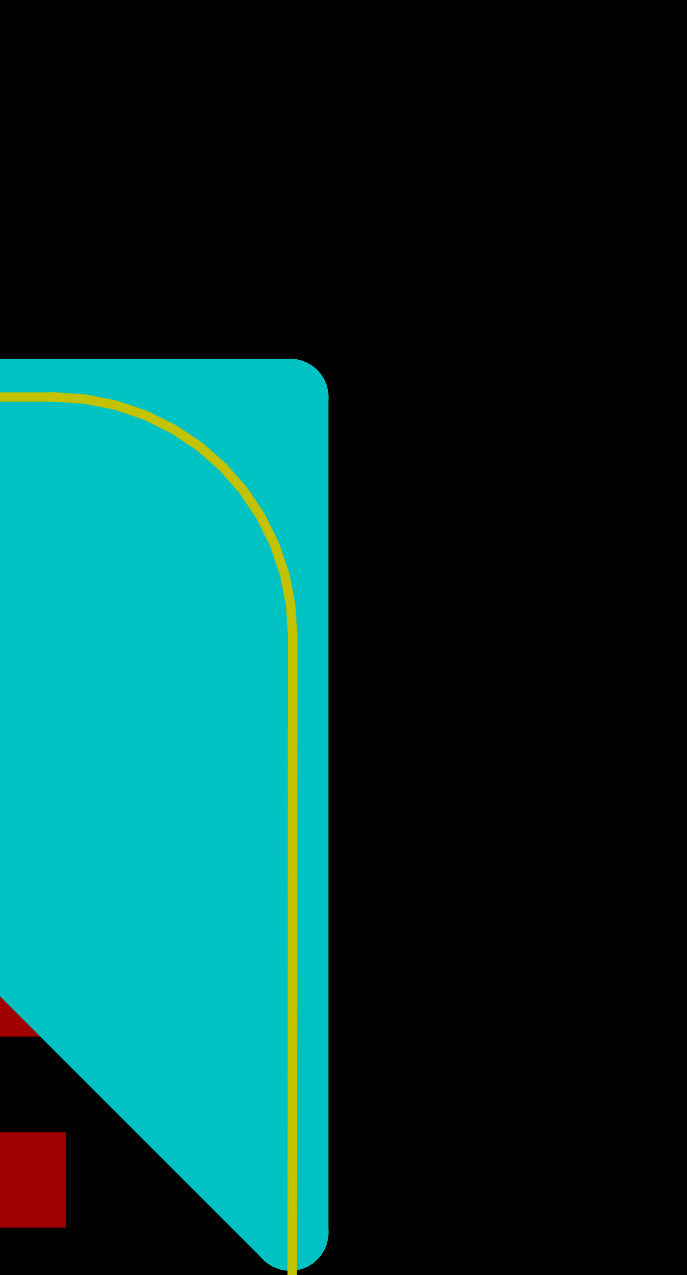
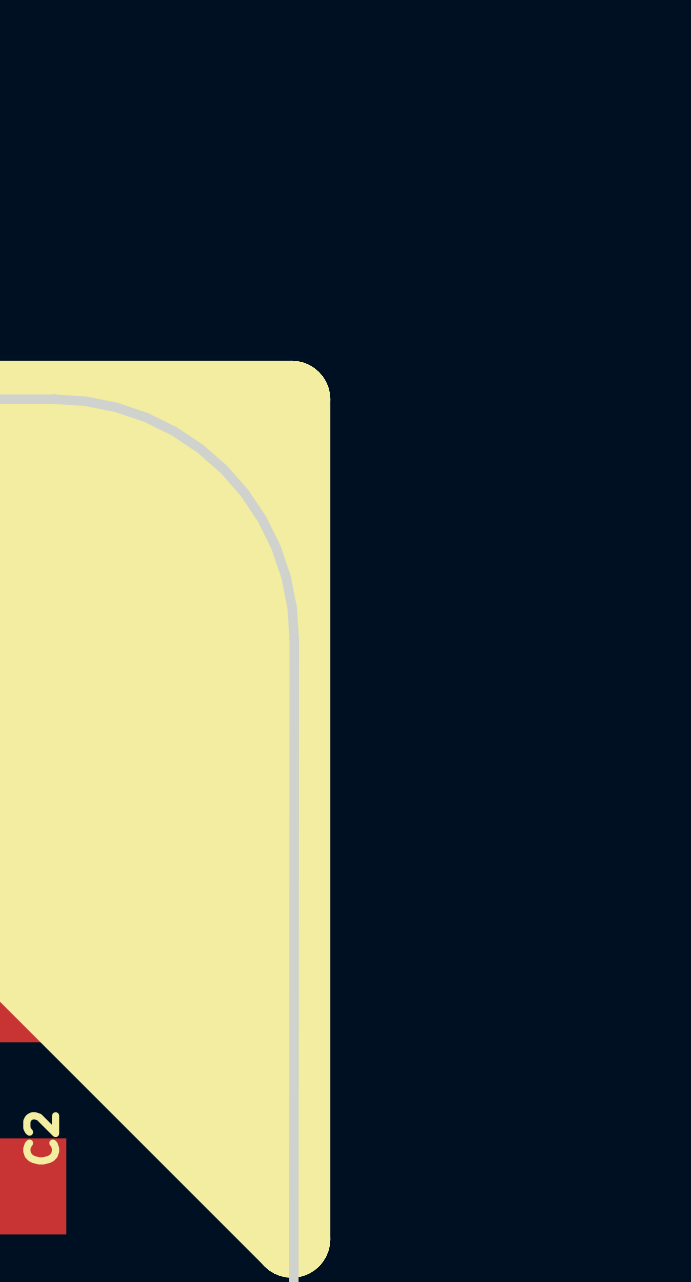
C2 name: none -> C2 (41, 1138)

